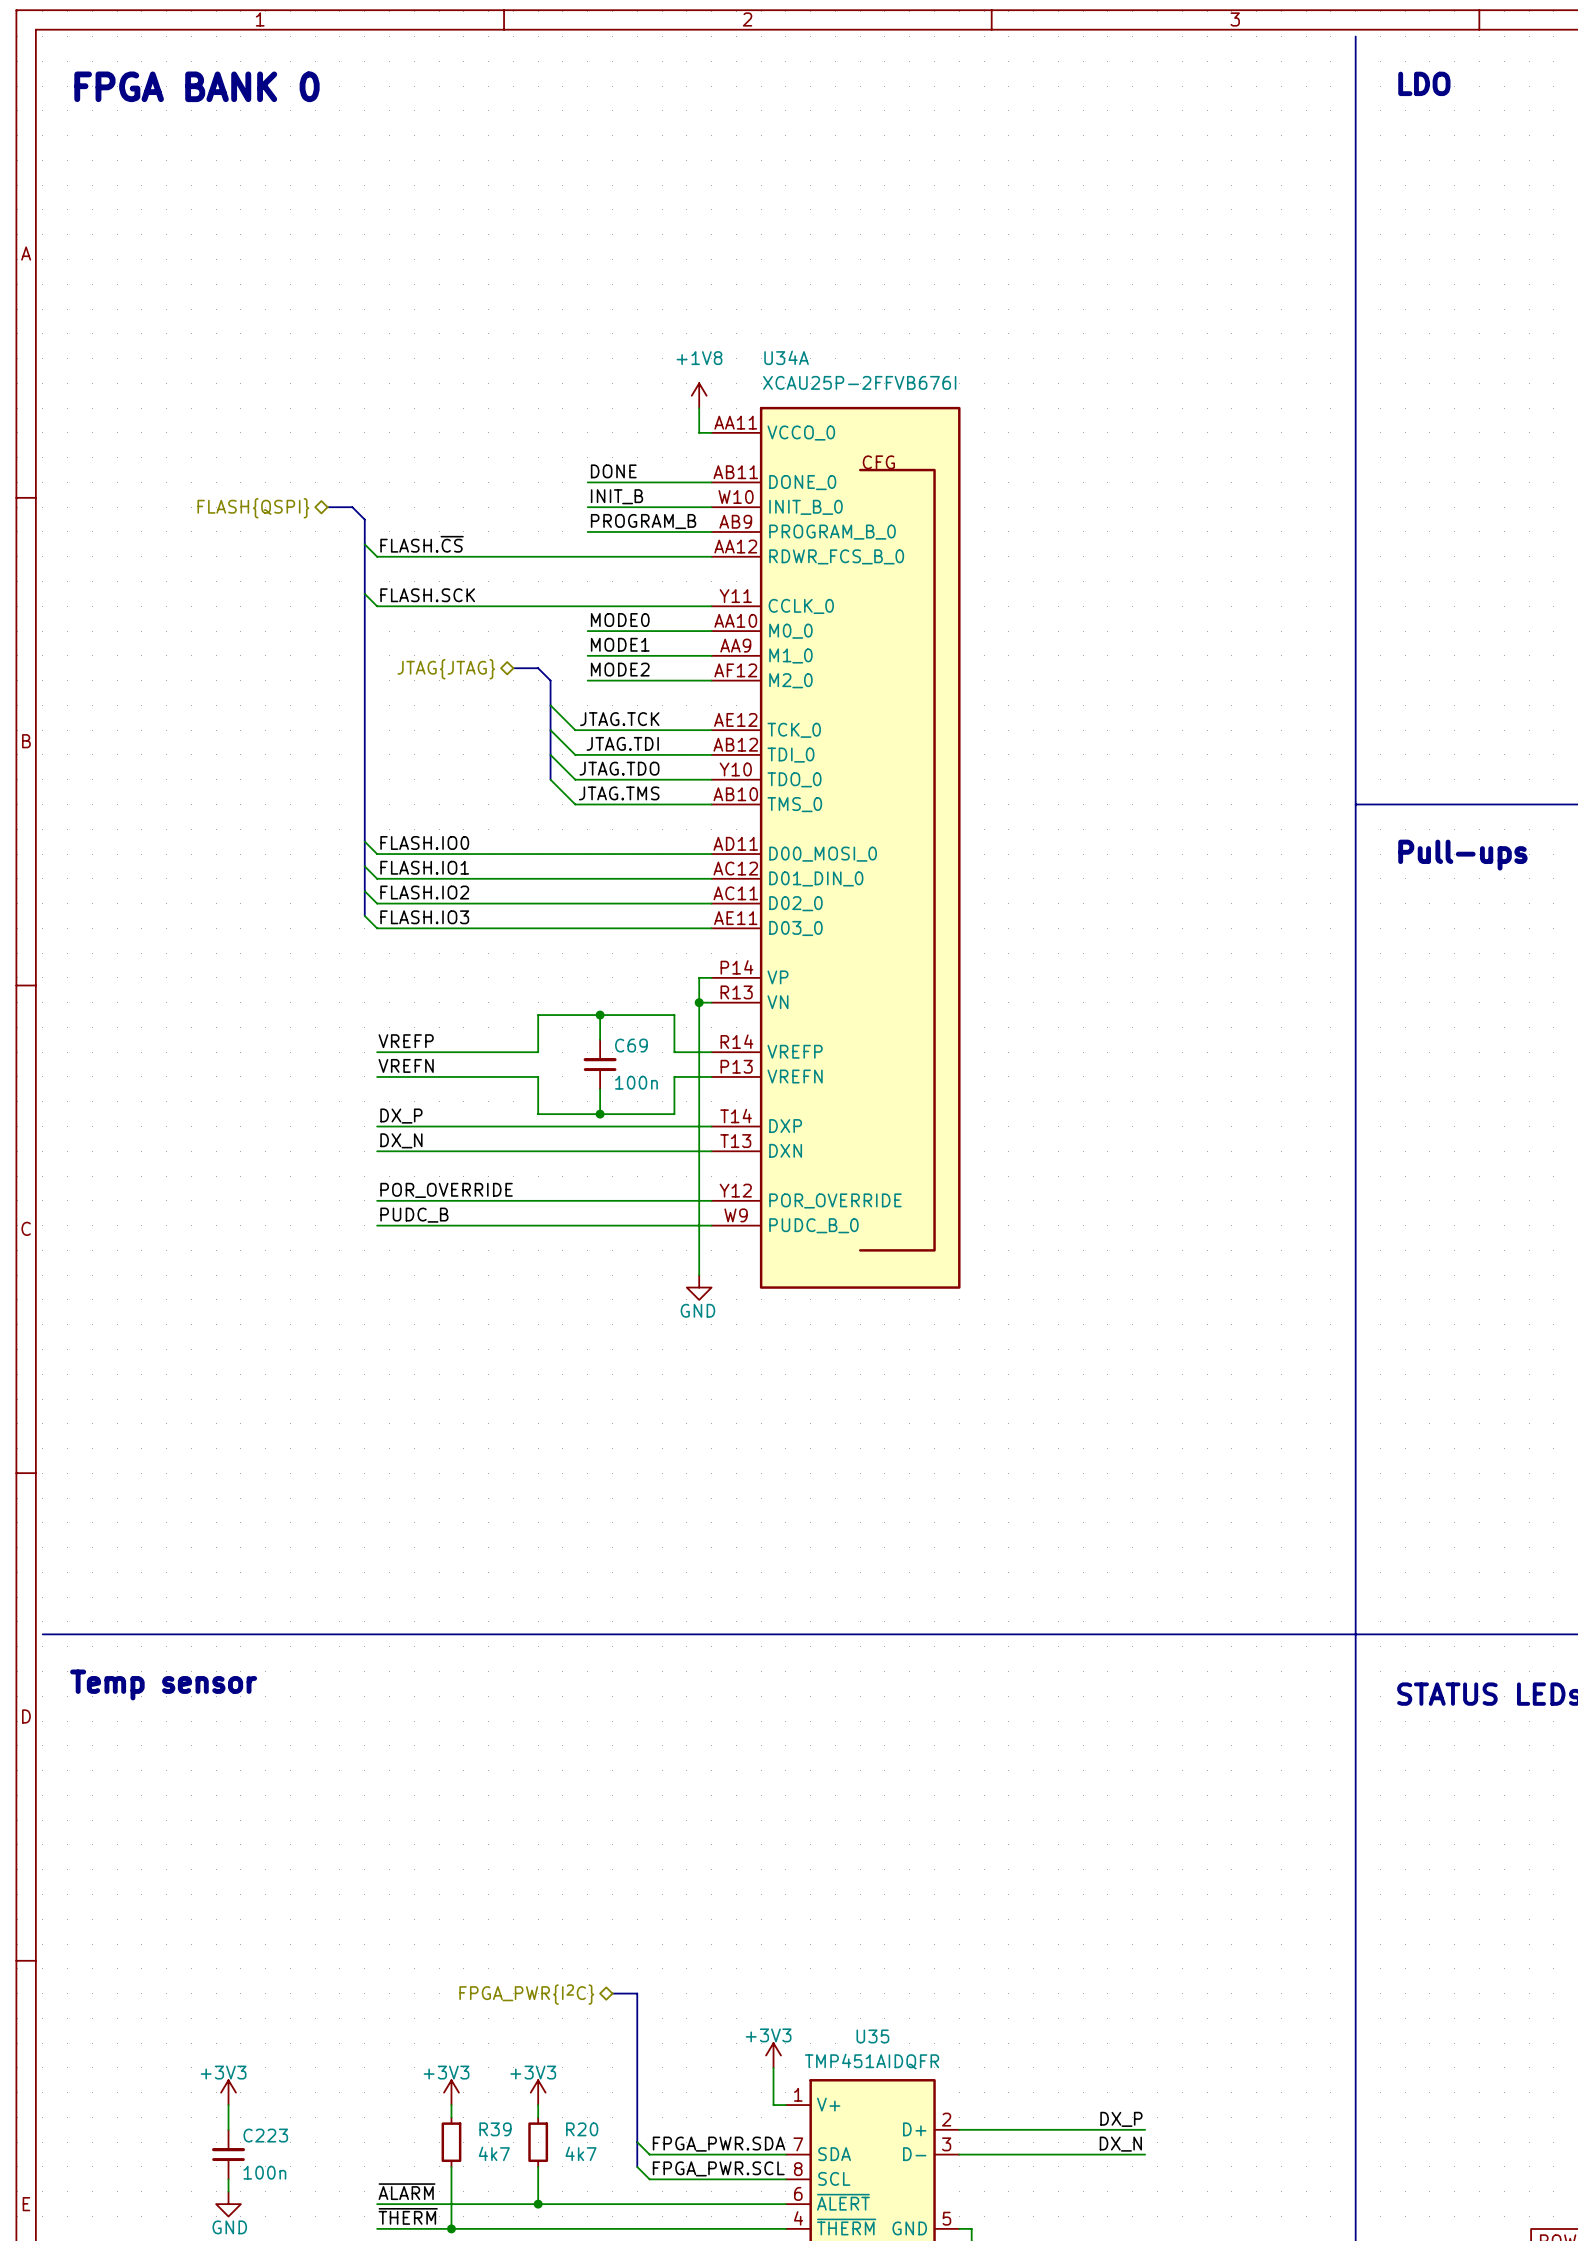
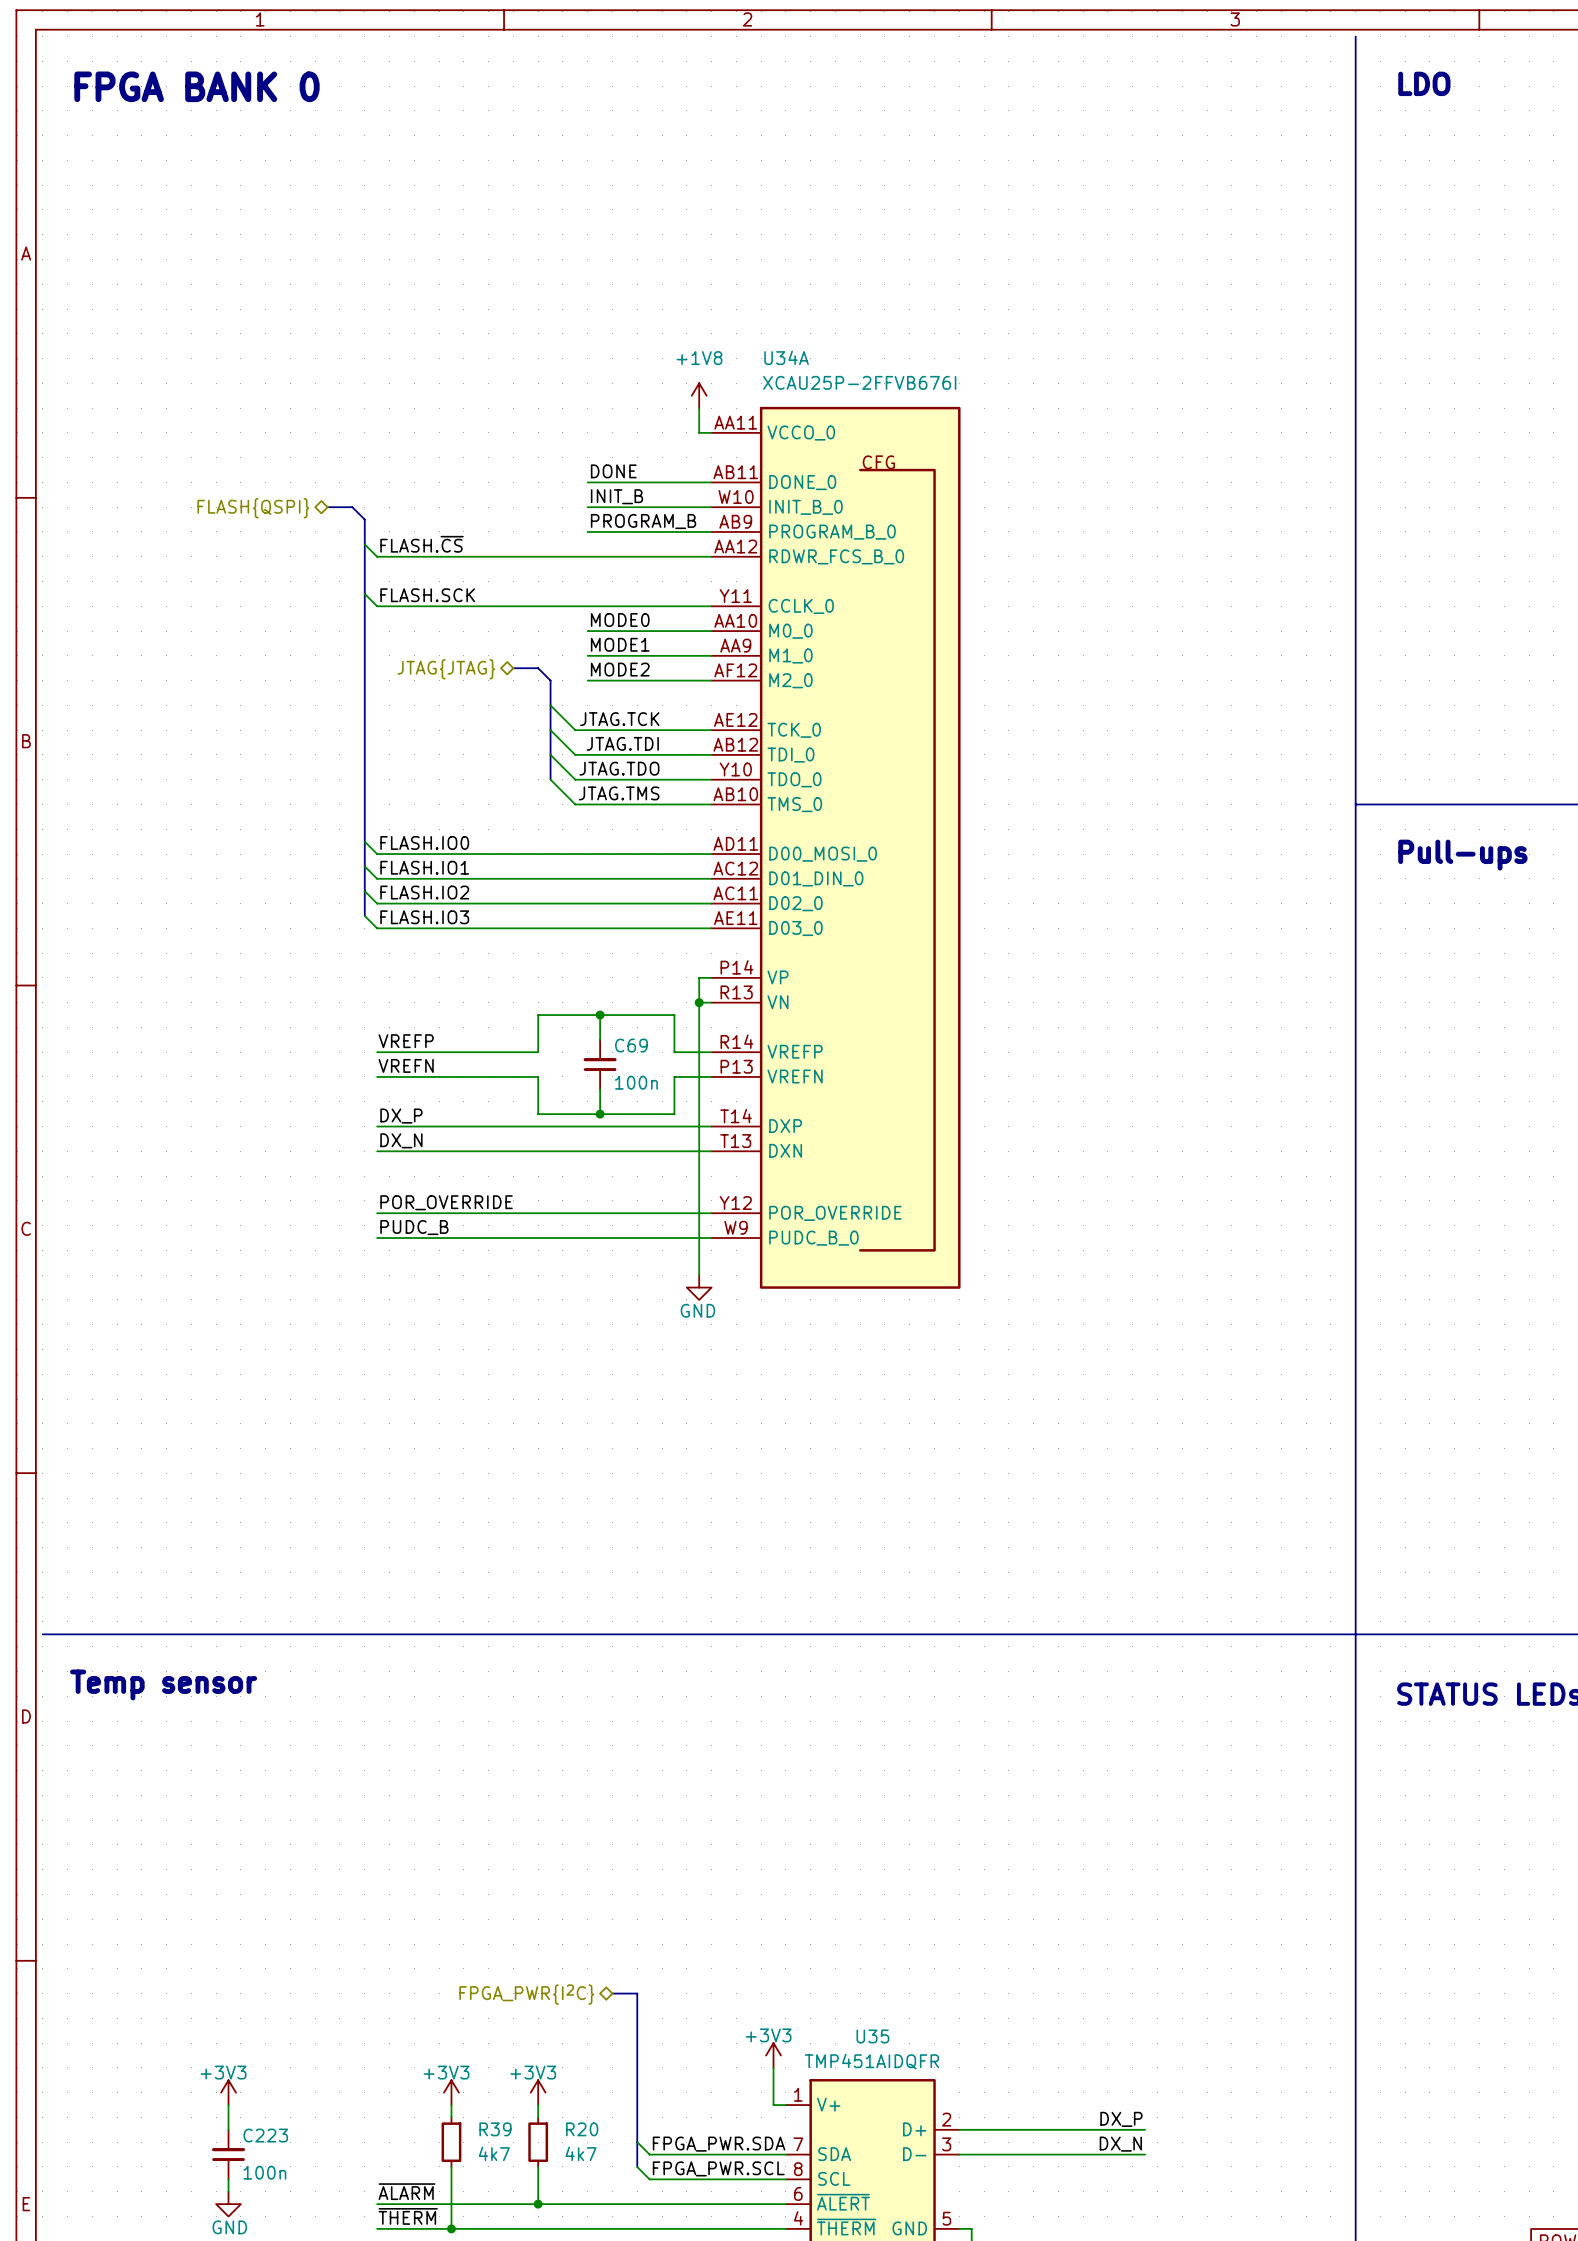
U34A symbol: [711, 406, 961, 1289] -> [711, 406, 961, 1289]
label position: POR_OVERRIDE (446, 1190) -> POR_OVERRIDE (446, 1202)
wire: (377, 1200) (711, 1200) -> (377, 1213) (711, 1213)
label position: PUDC_B (414, 1215) -> PUDC_B (414, 1227)
wire: (377, 1225) (711, 1225) -> (377, 1238) (711, 1238)

